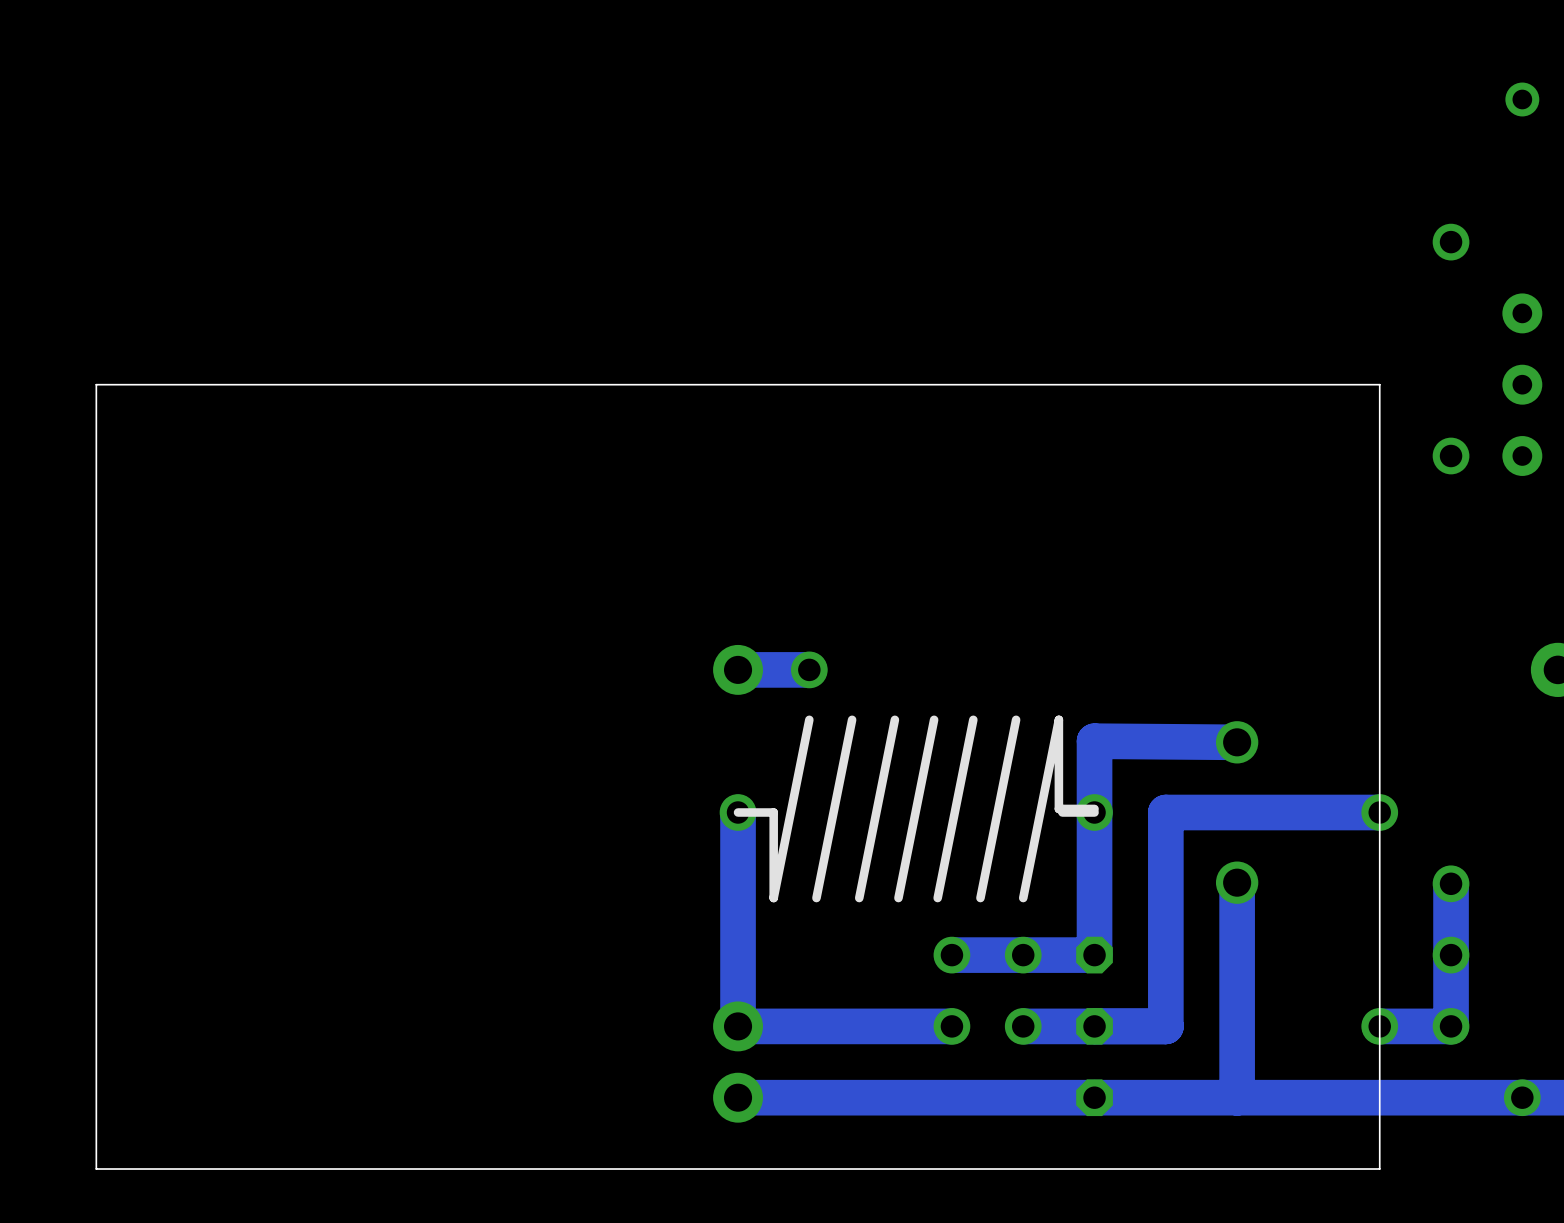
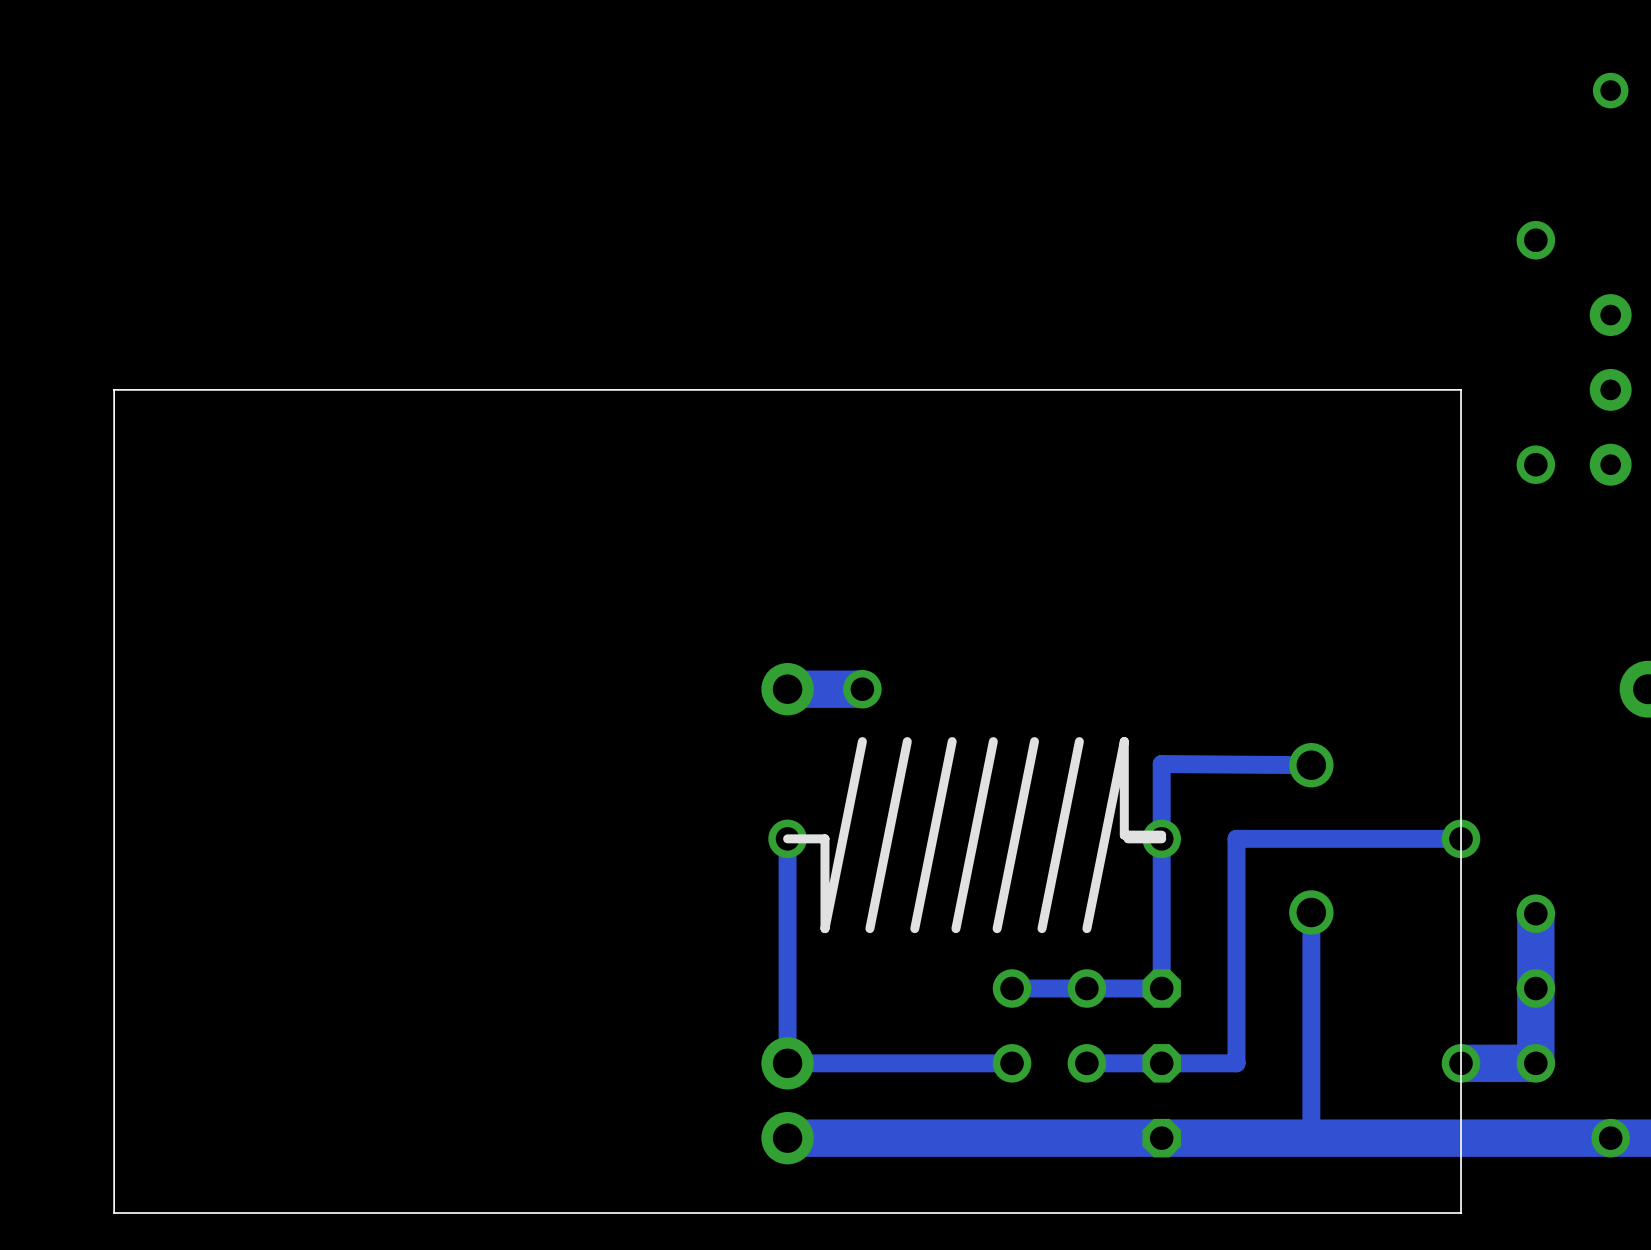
track width: thick (1237, 742) (1094, 741) (1094, 955) (951, 955) -> thin (1311, 765) (1161, 764) (1161, 988) (1012, 988)
track width: thick (738, 812) (738, 1026) (951, 1026) -> thin (787, 838) (787, 1063) (1012, 1063)
track width: thick (1379, 812) (1165, 812) (1165, 1026) (1023, 1026) -> thin (1461, 838) (1236, 838) (1236, 1063) (1086, 1063)
track width: thick (1237, 882) (1237, 1097) -> thin (1311, 912) (1311, 1138)

